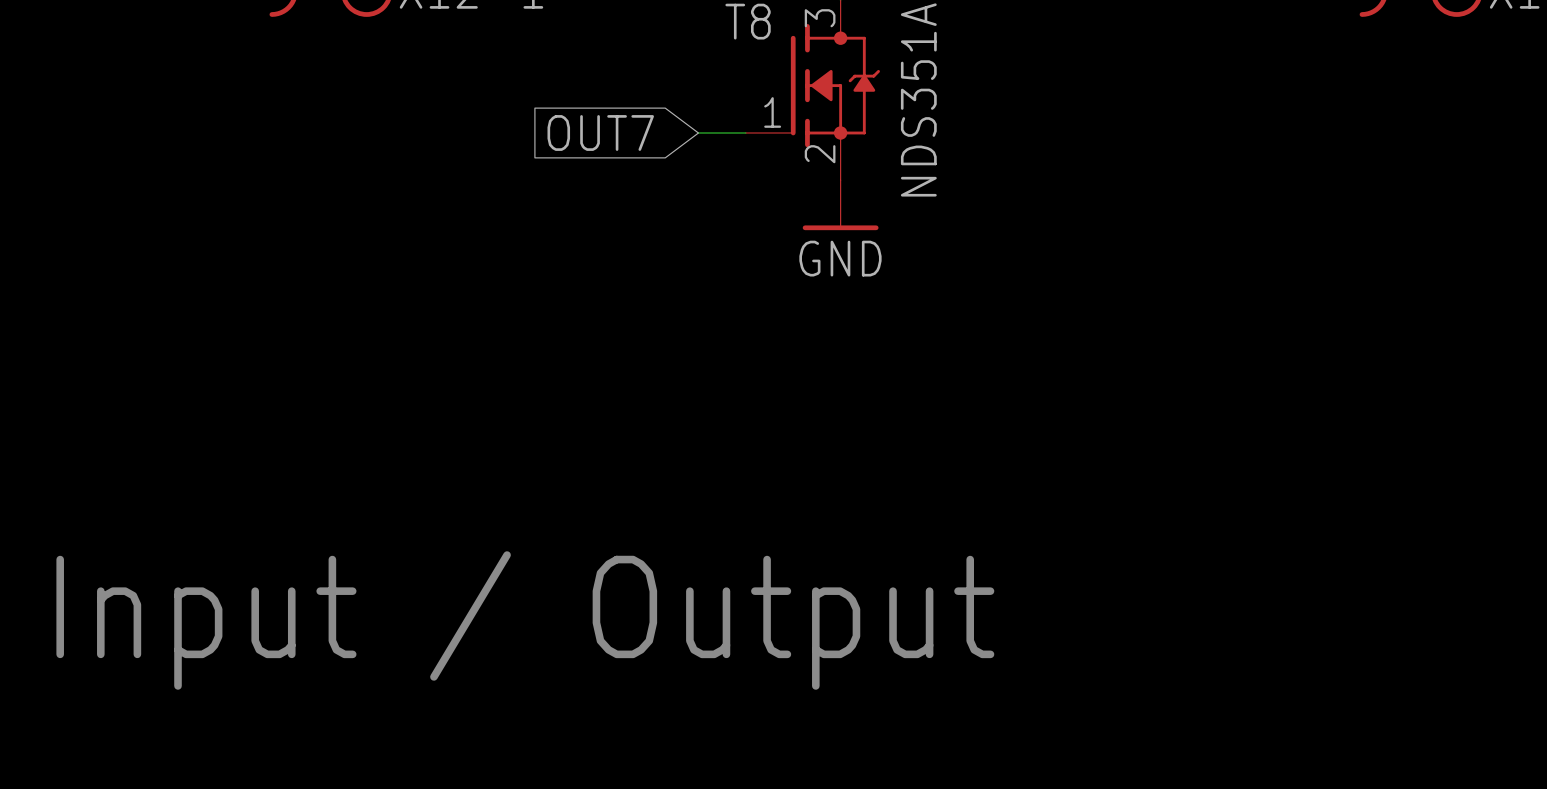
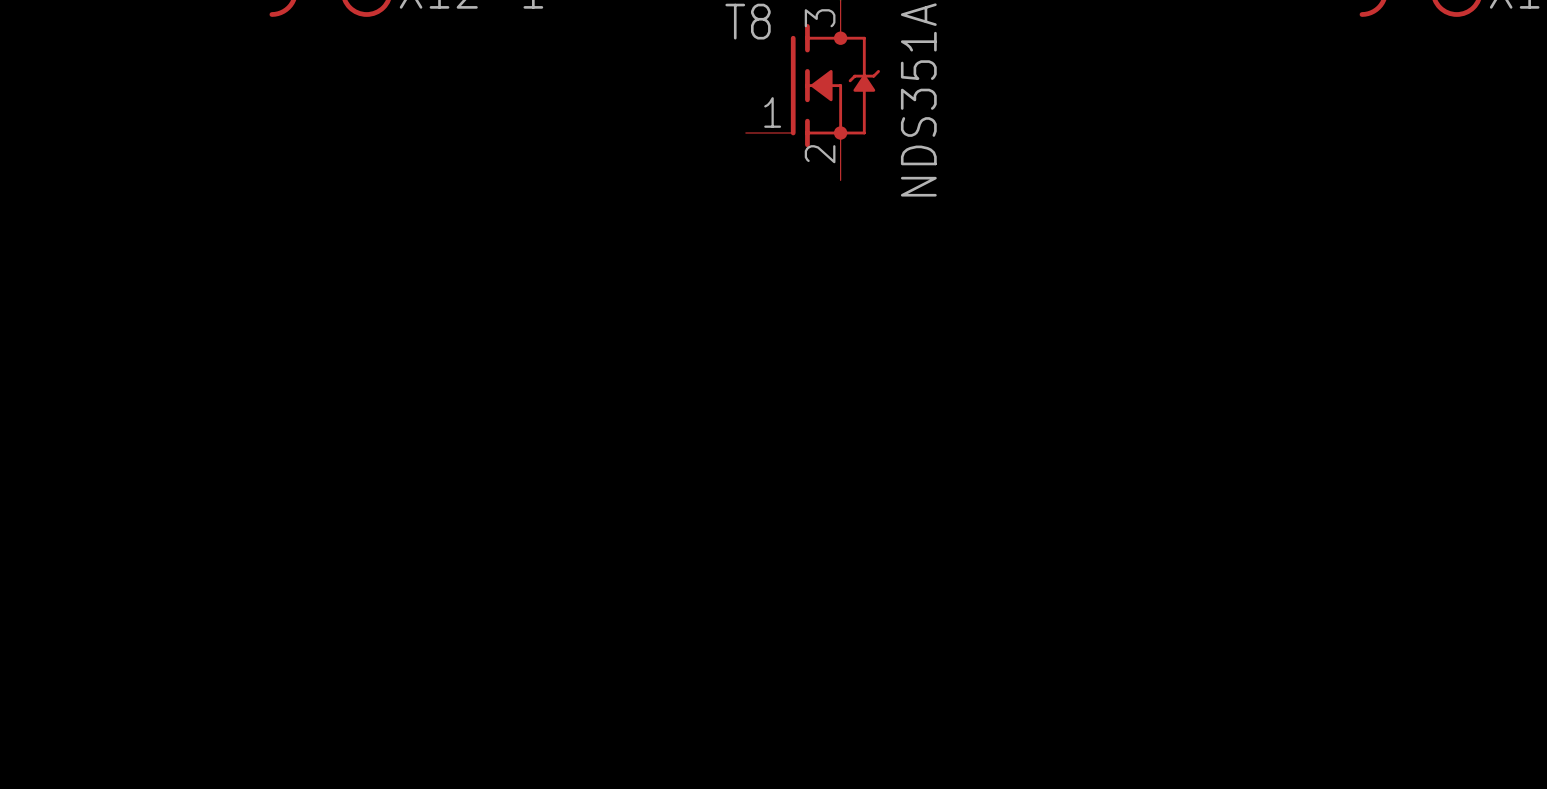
global label: OUT7 (600, 132) -> none
wire: (698, 132) (745, 132) -> none
power symbol: GND (840, 205) -> none
text: Input / Output (525, 620) -> none

